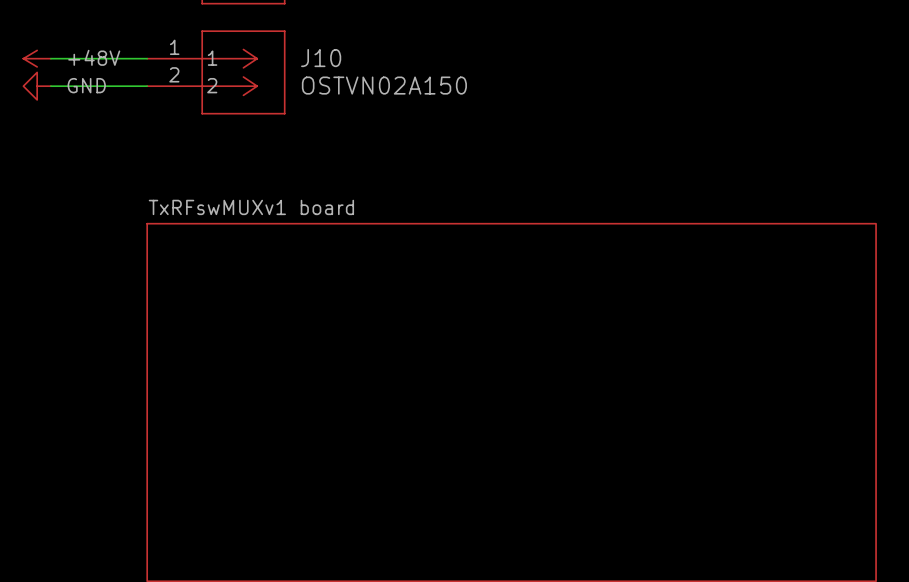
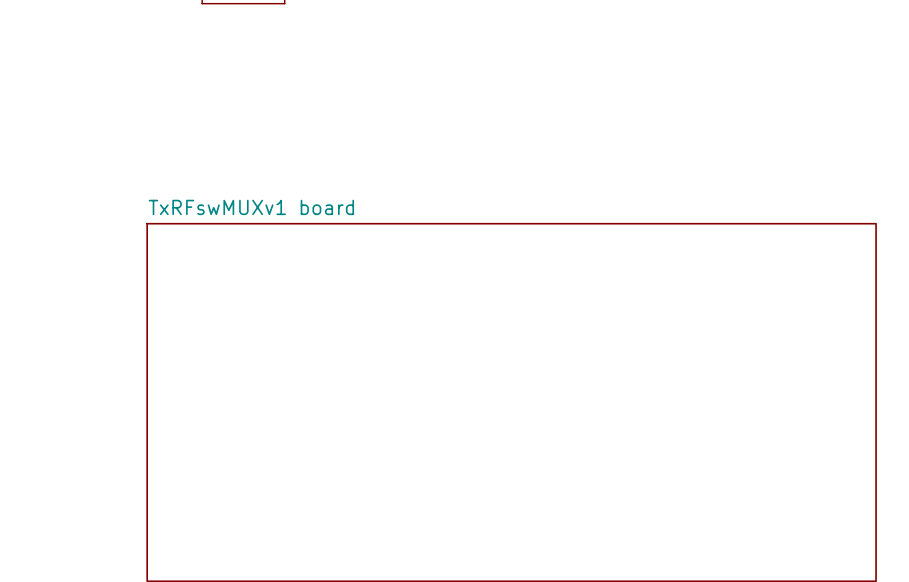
power symbol: +48V (37, 58) -> none
wire: (50, 58) (147, 58) -> none
J10: OSTVN02A150 (216, 72) -> none
power symbol: GND (37, 86) -> none
wire: (50, 86) (147, 86) -> none

